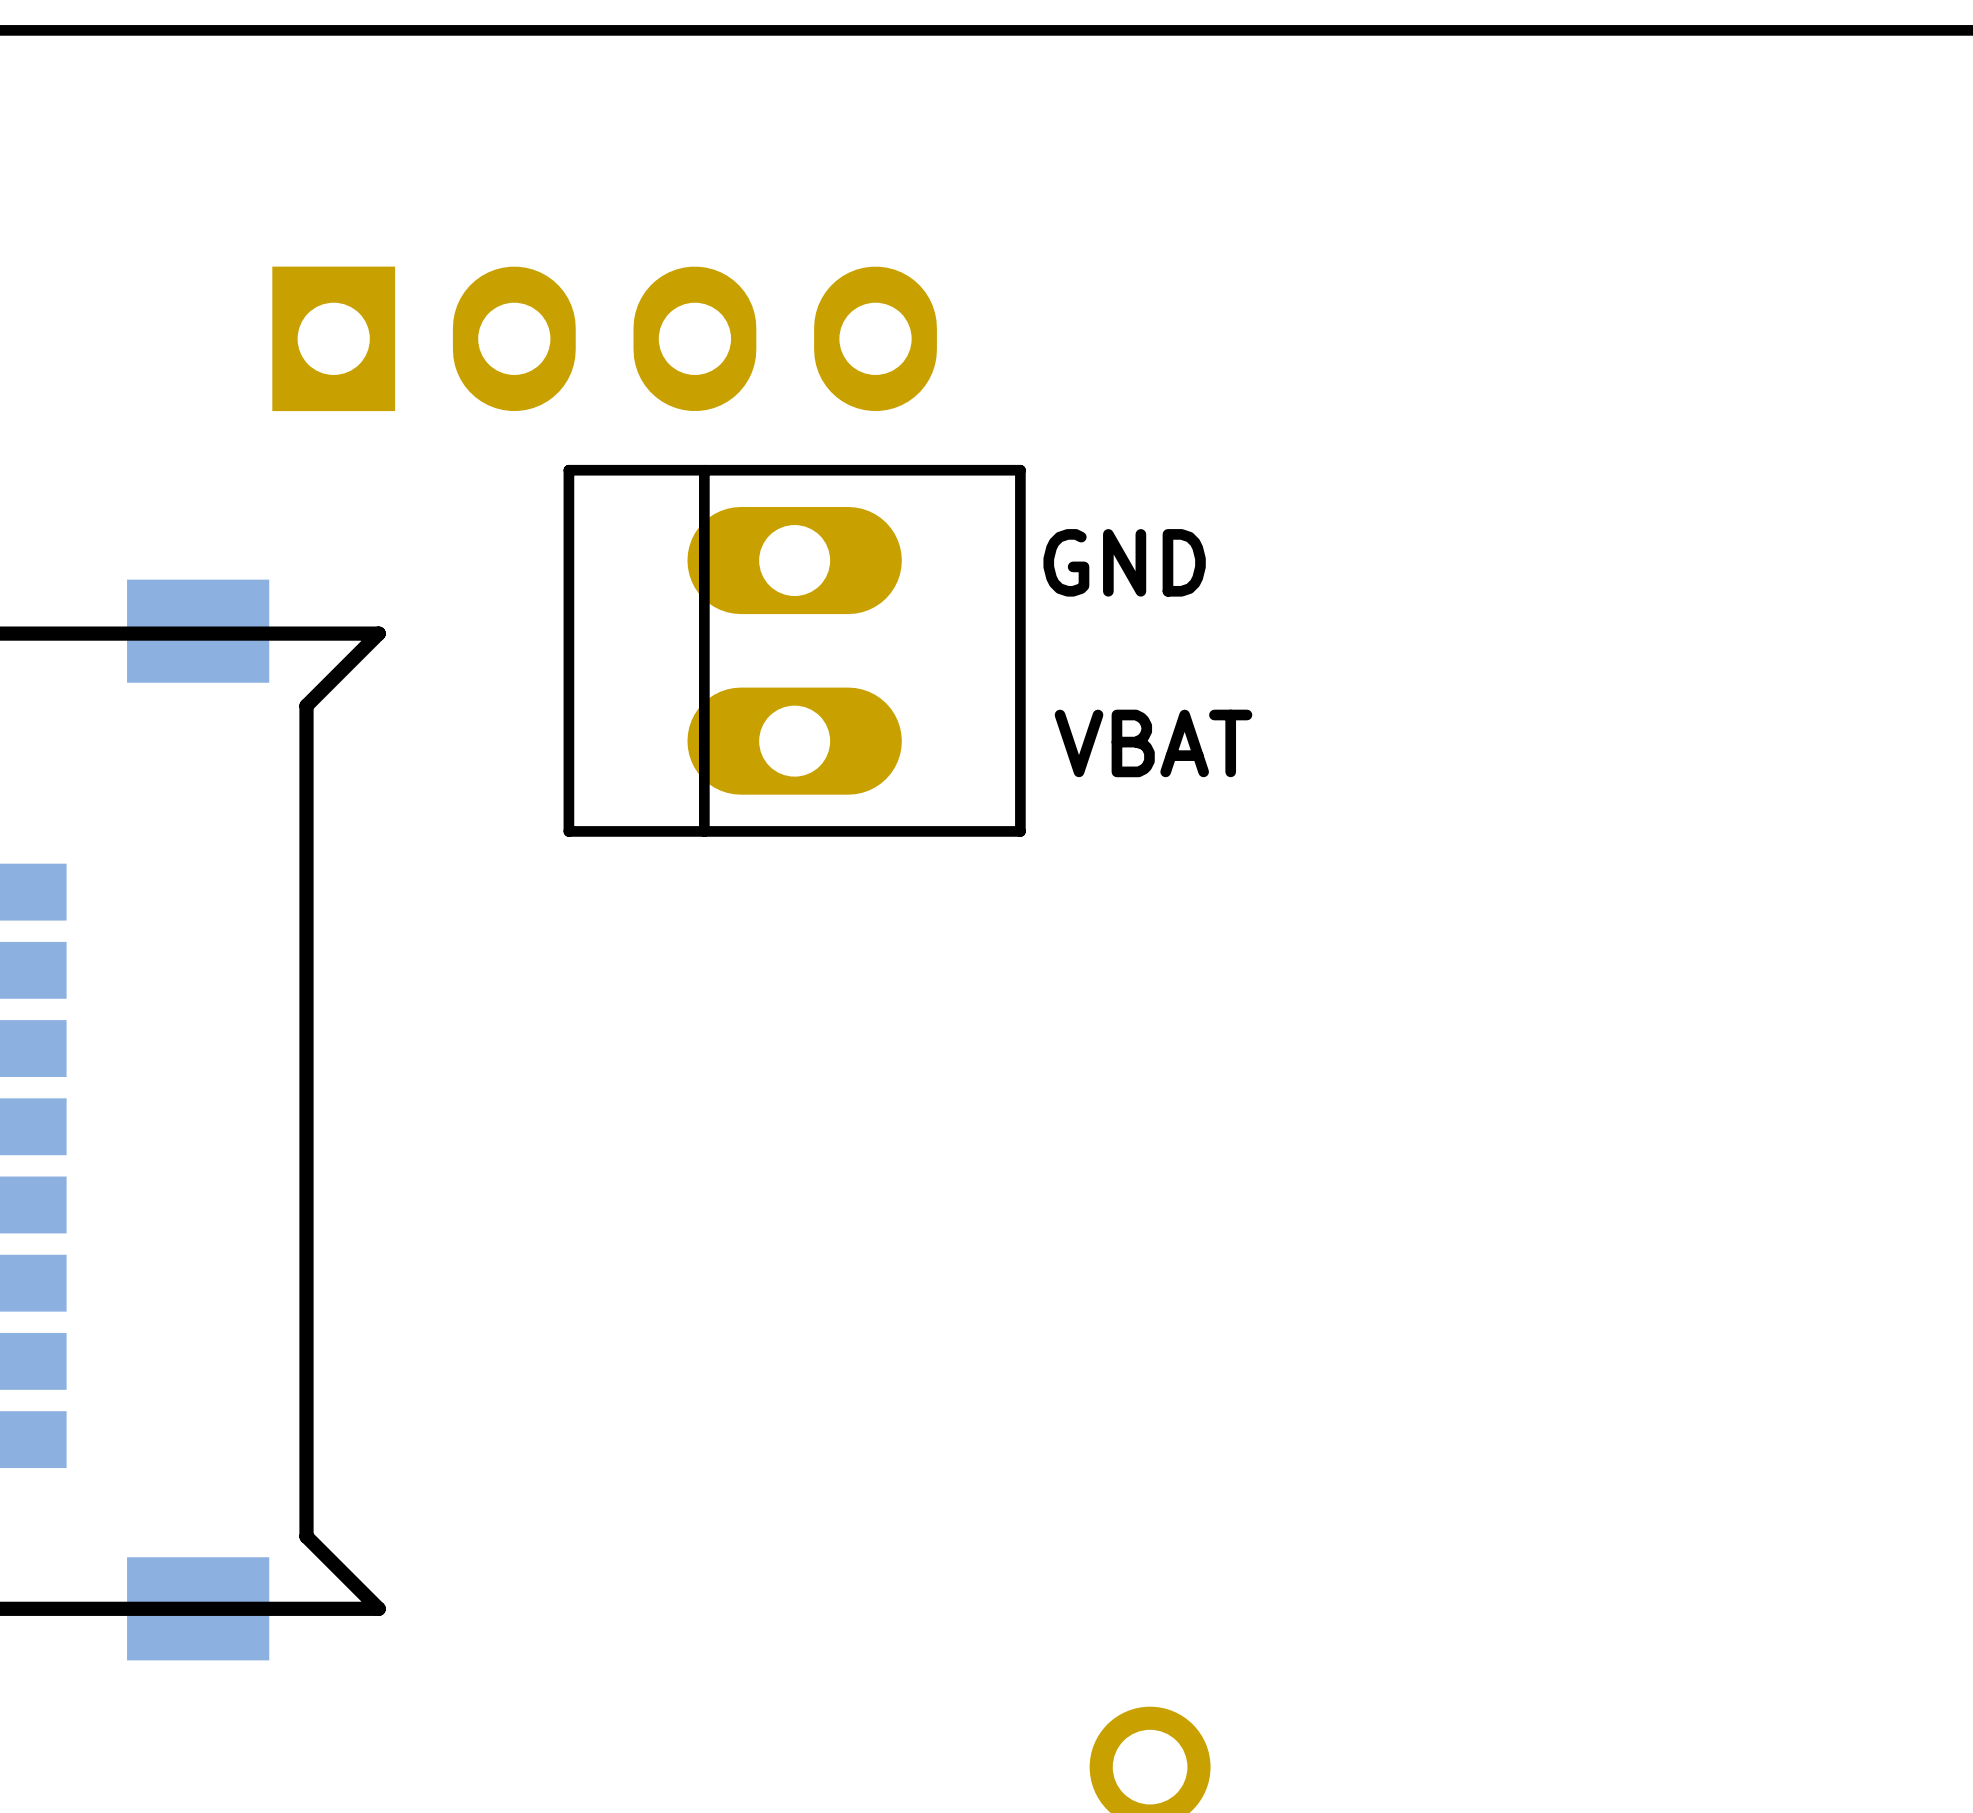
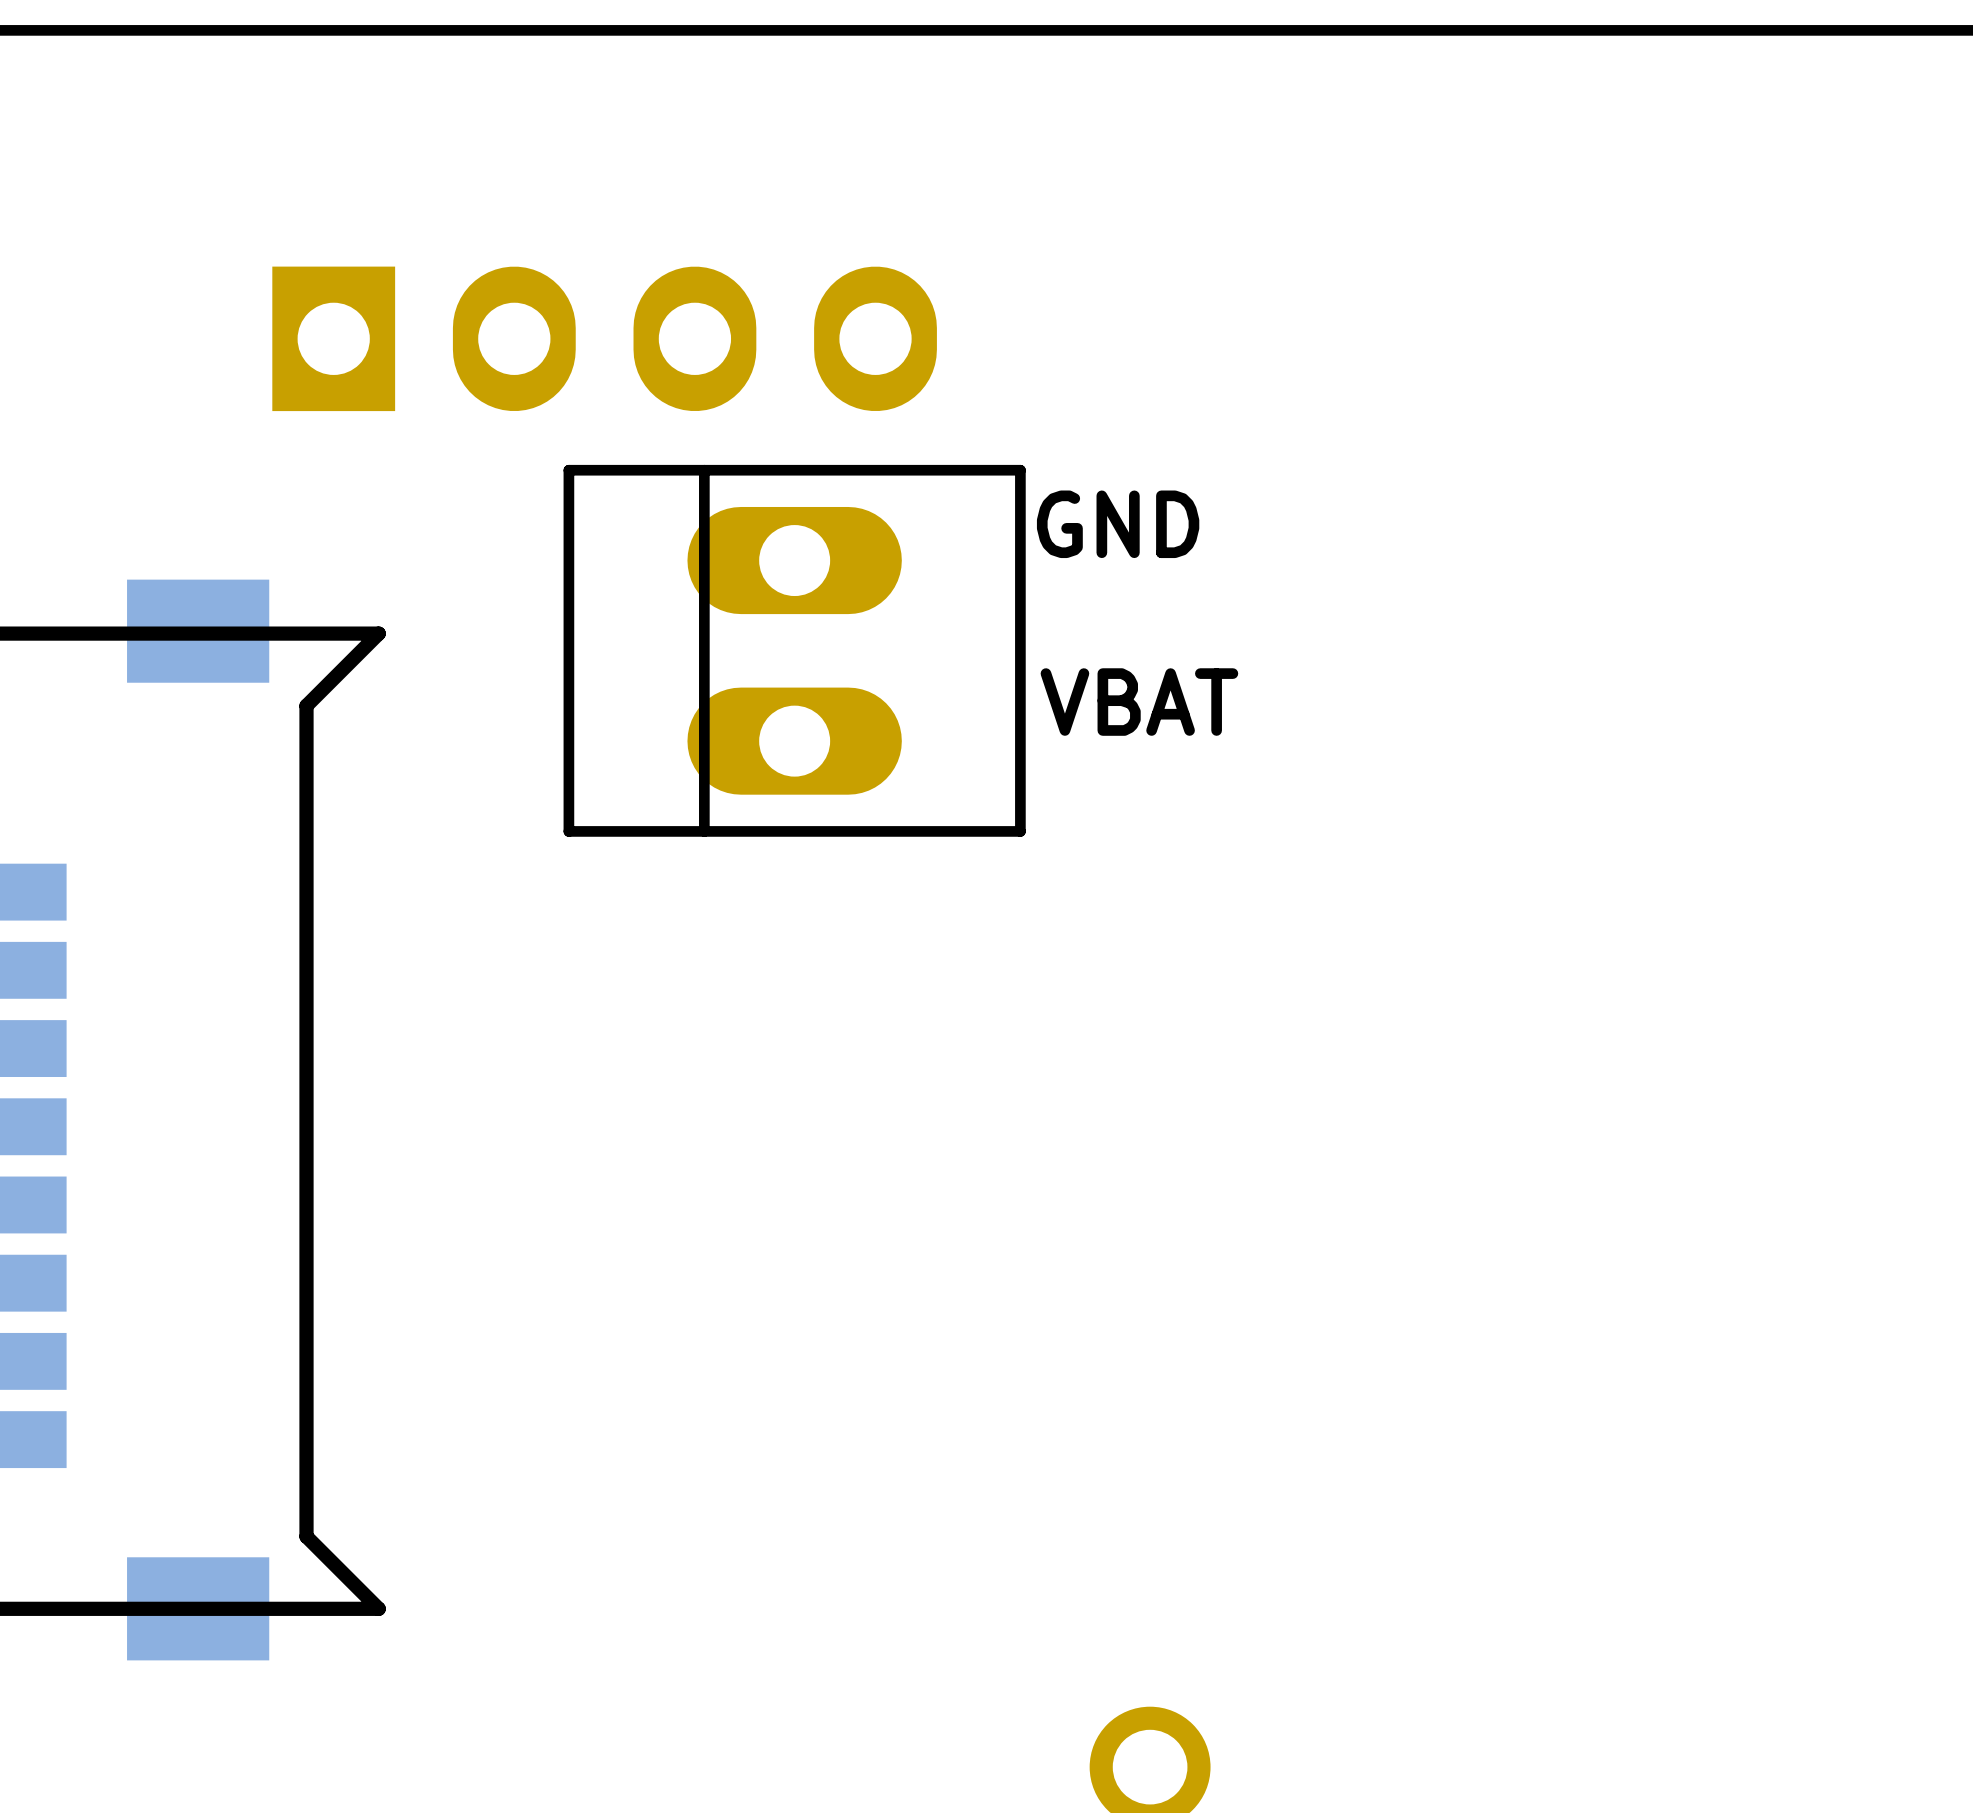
text position: GND (1124, 562) -> GND (1118, 524)
text position: VBAT (1153, 743) -> VBAT (1139, 702)

